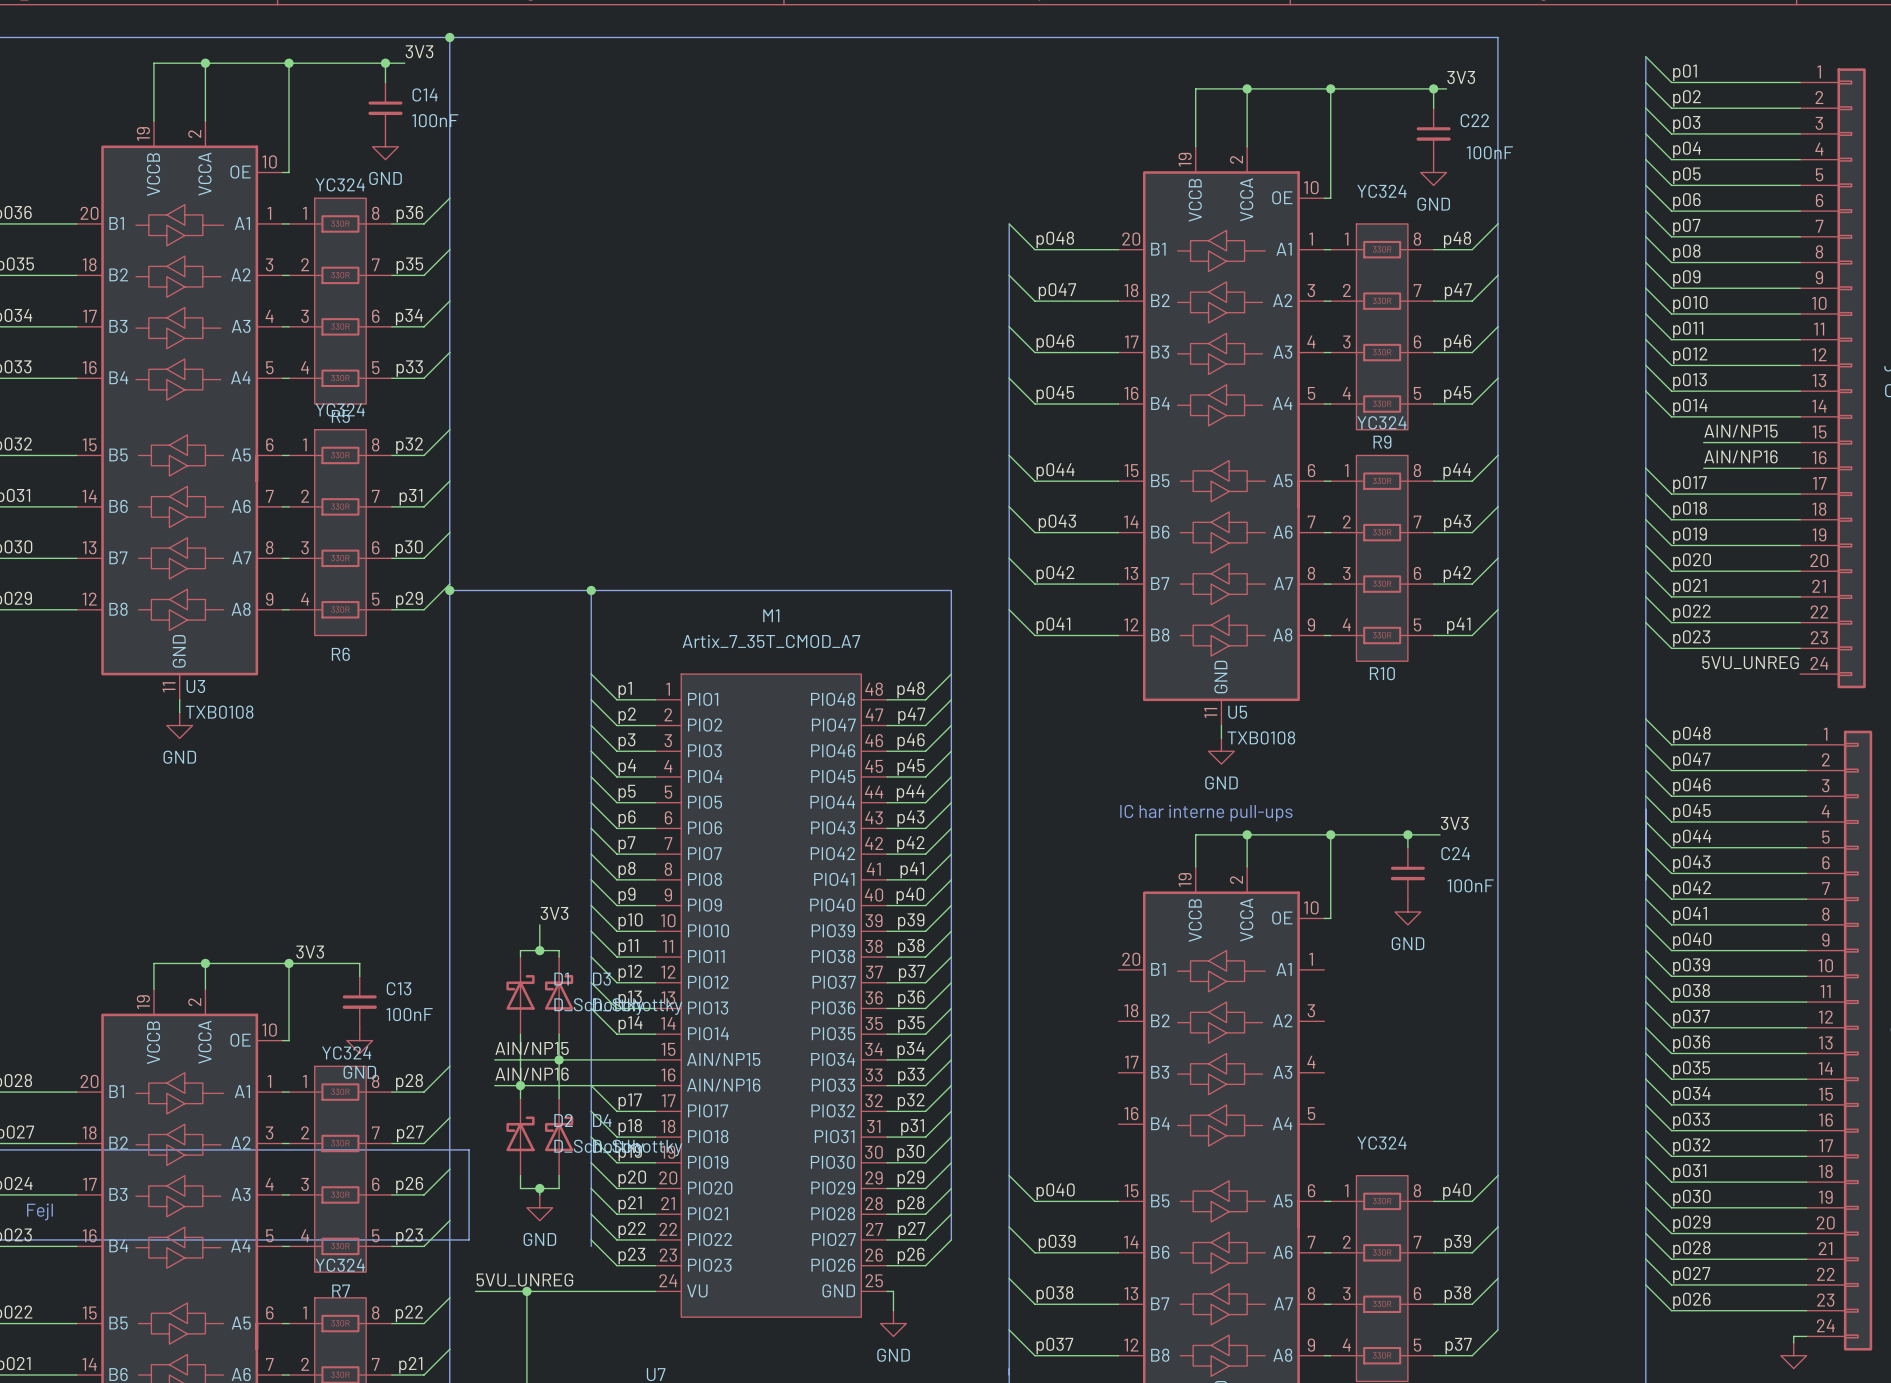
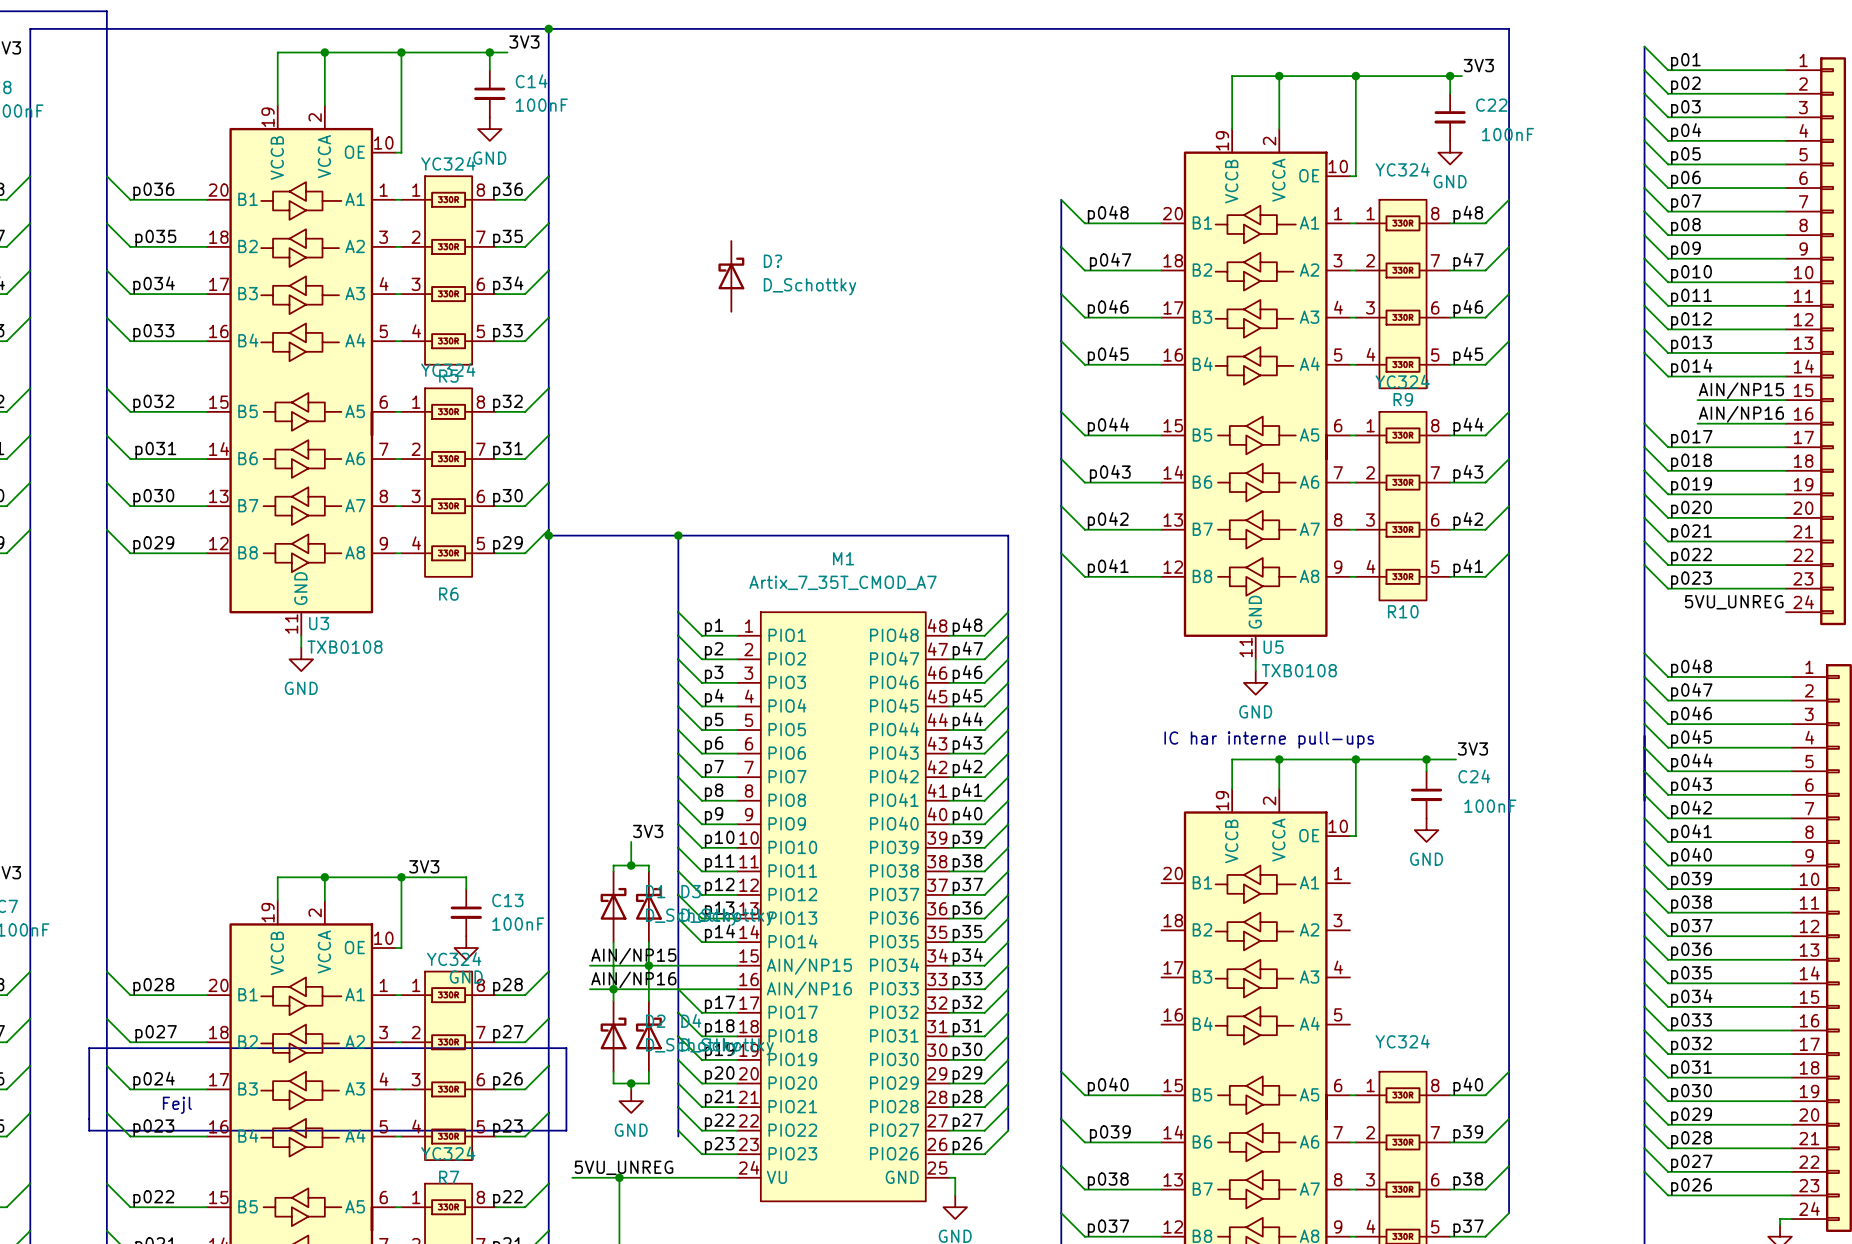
D?: none -> D_Schottky (731, 276)

